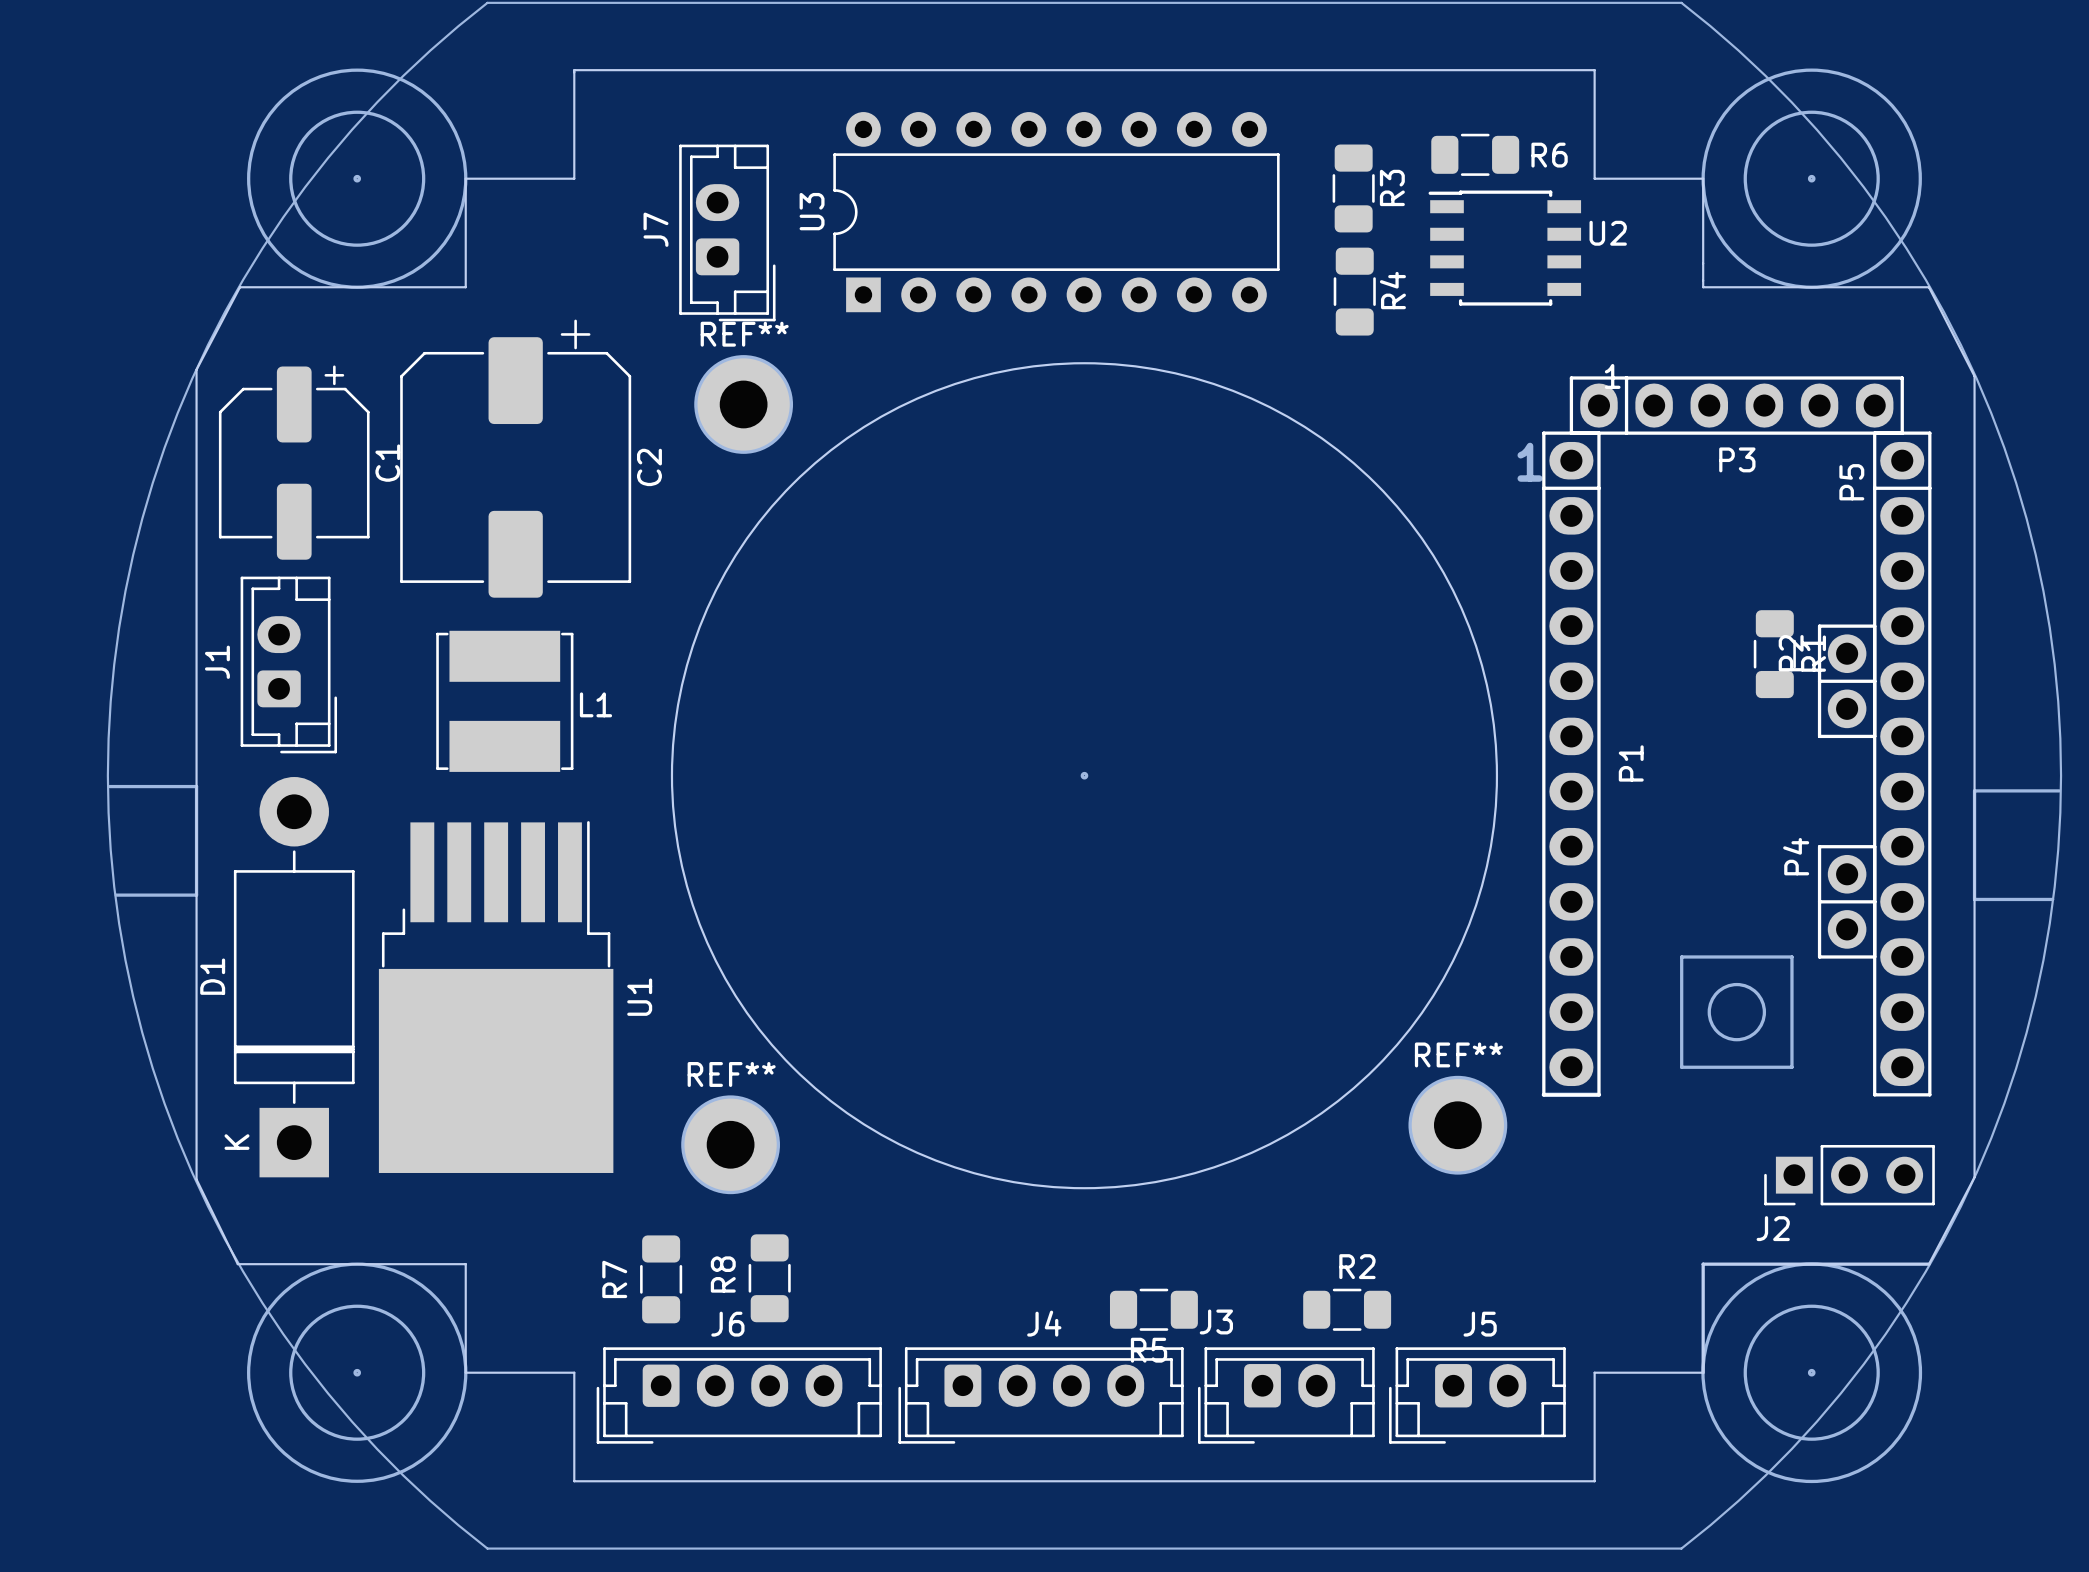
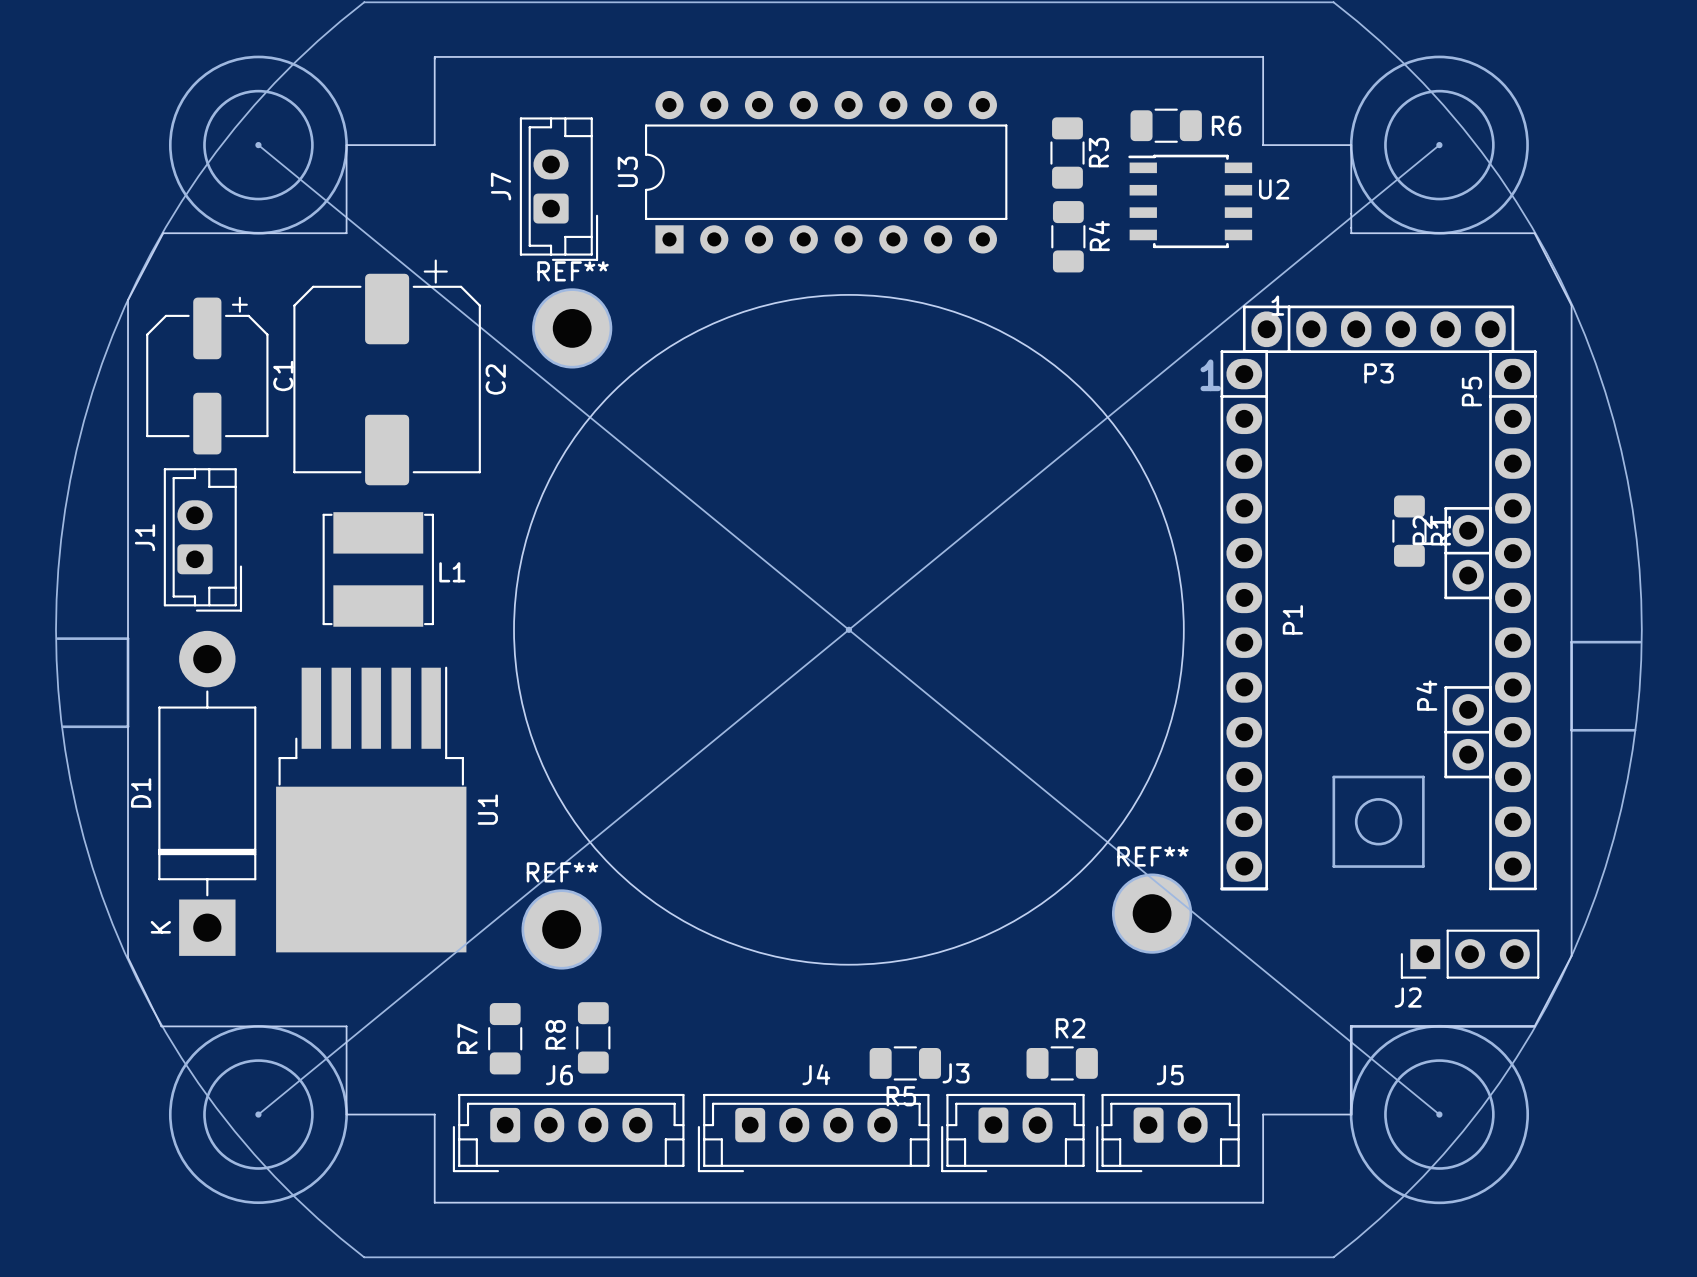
line: none -> (258, 145) (1439, 1114)
line: none -> (1439, 145) (258, 1114)

